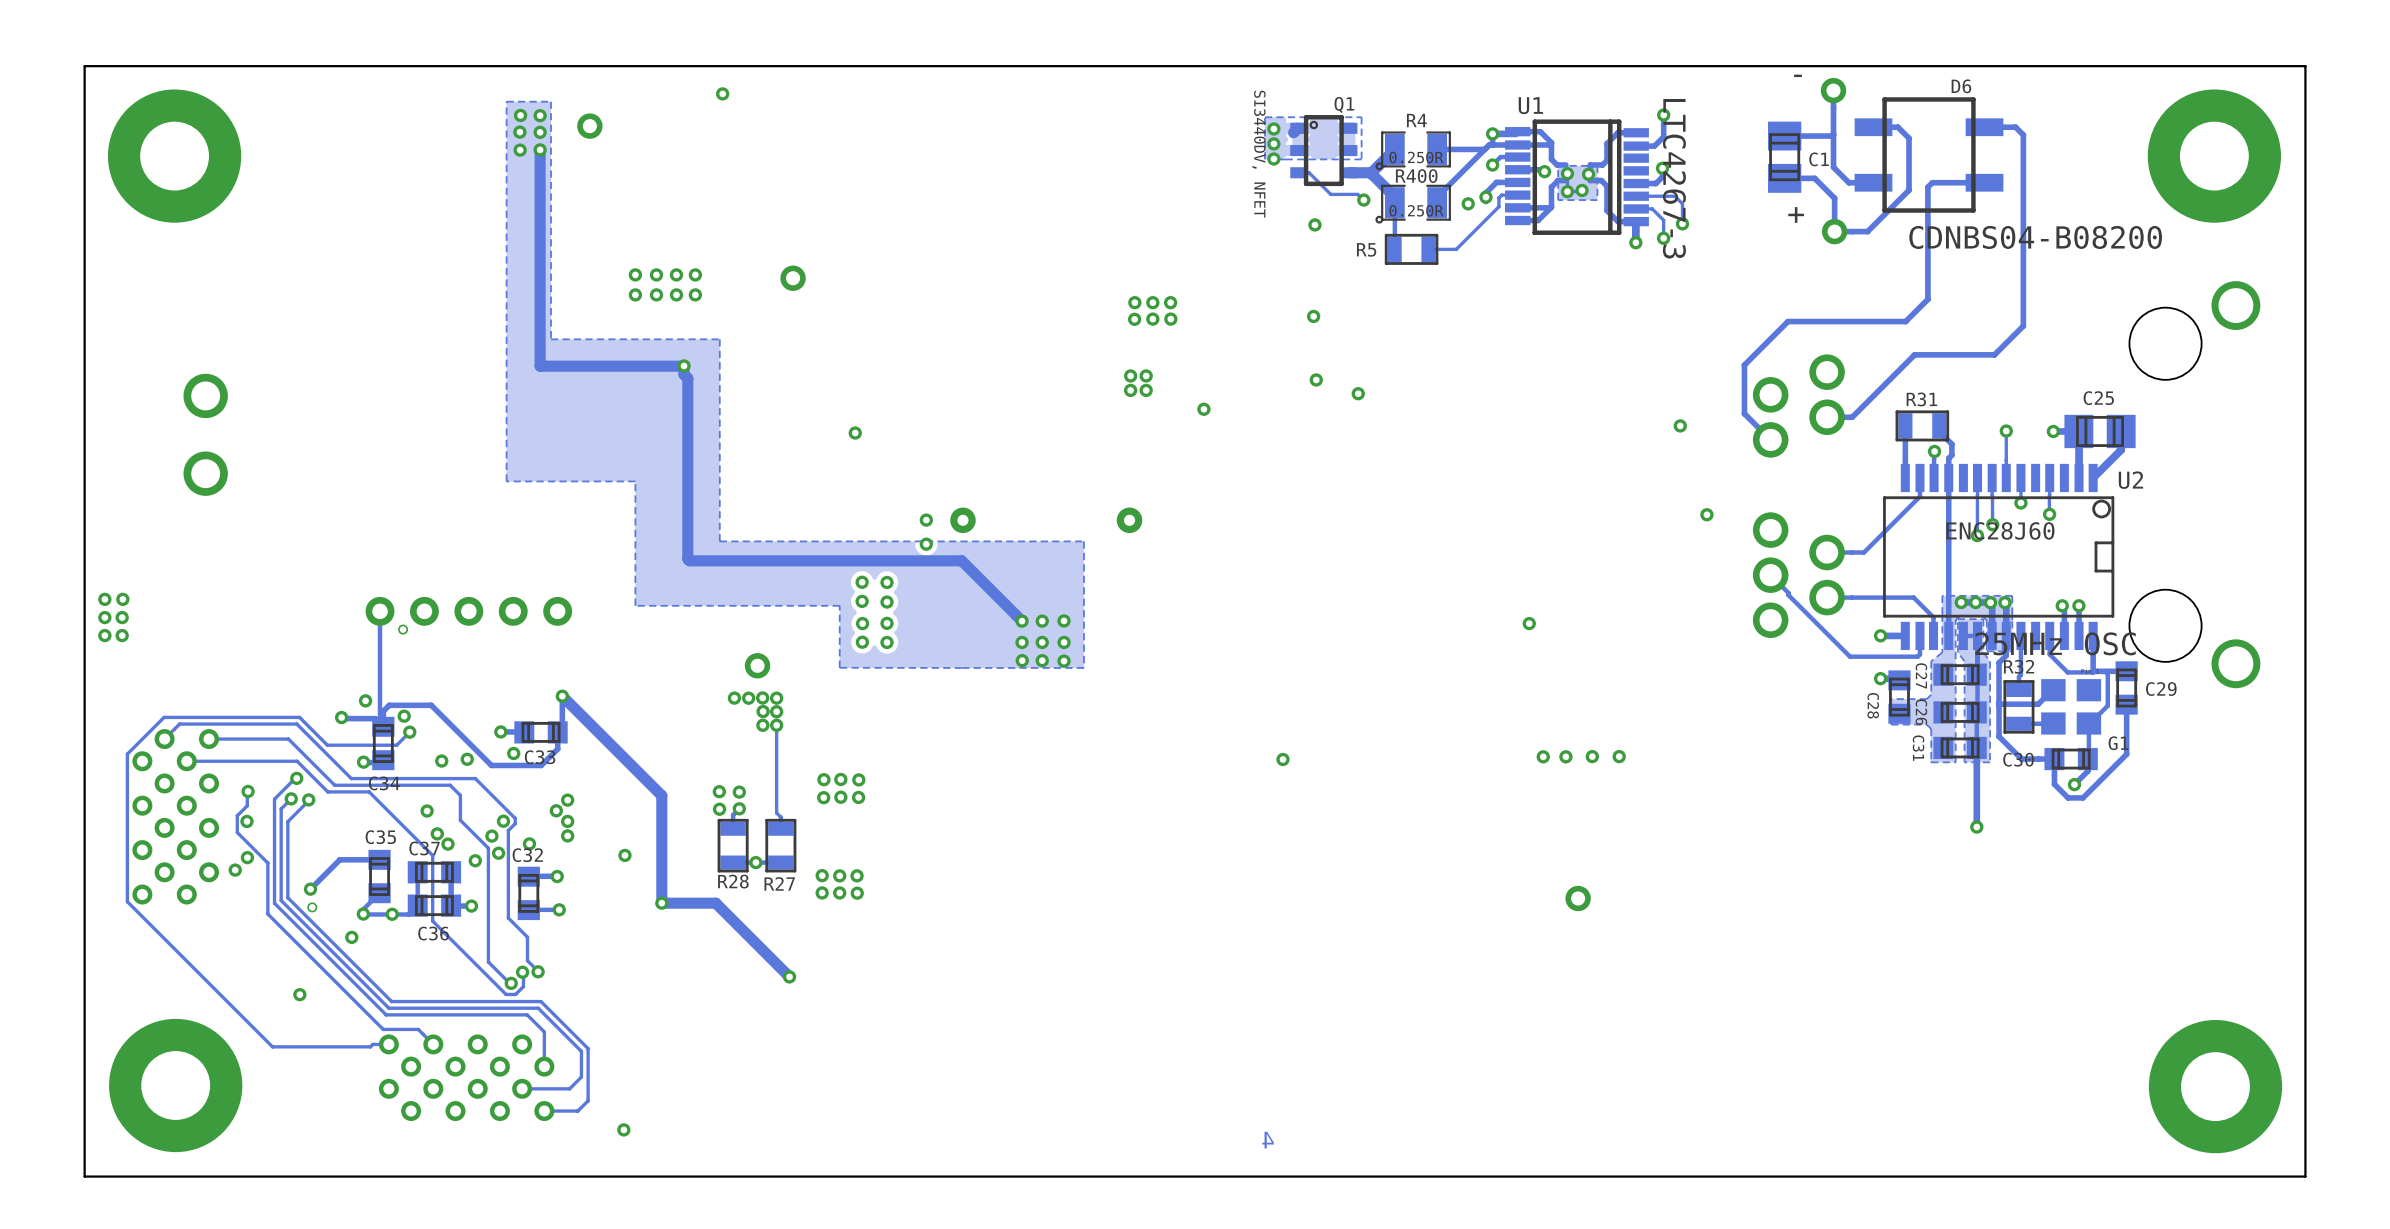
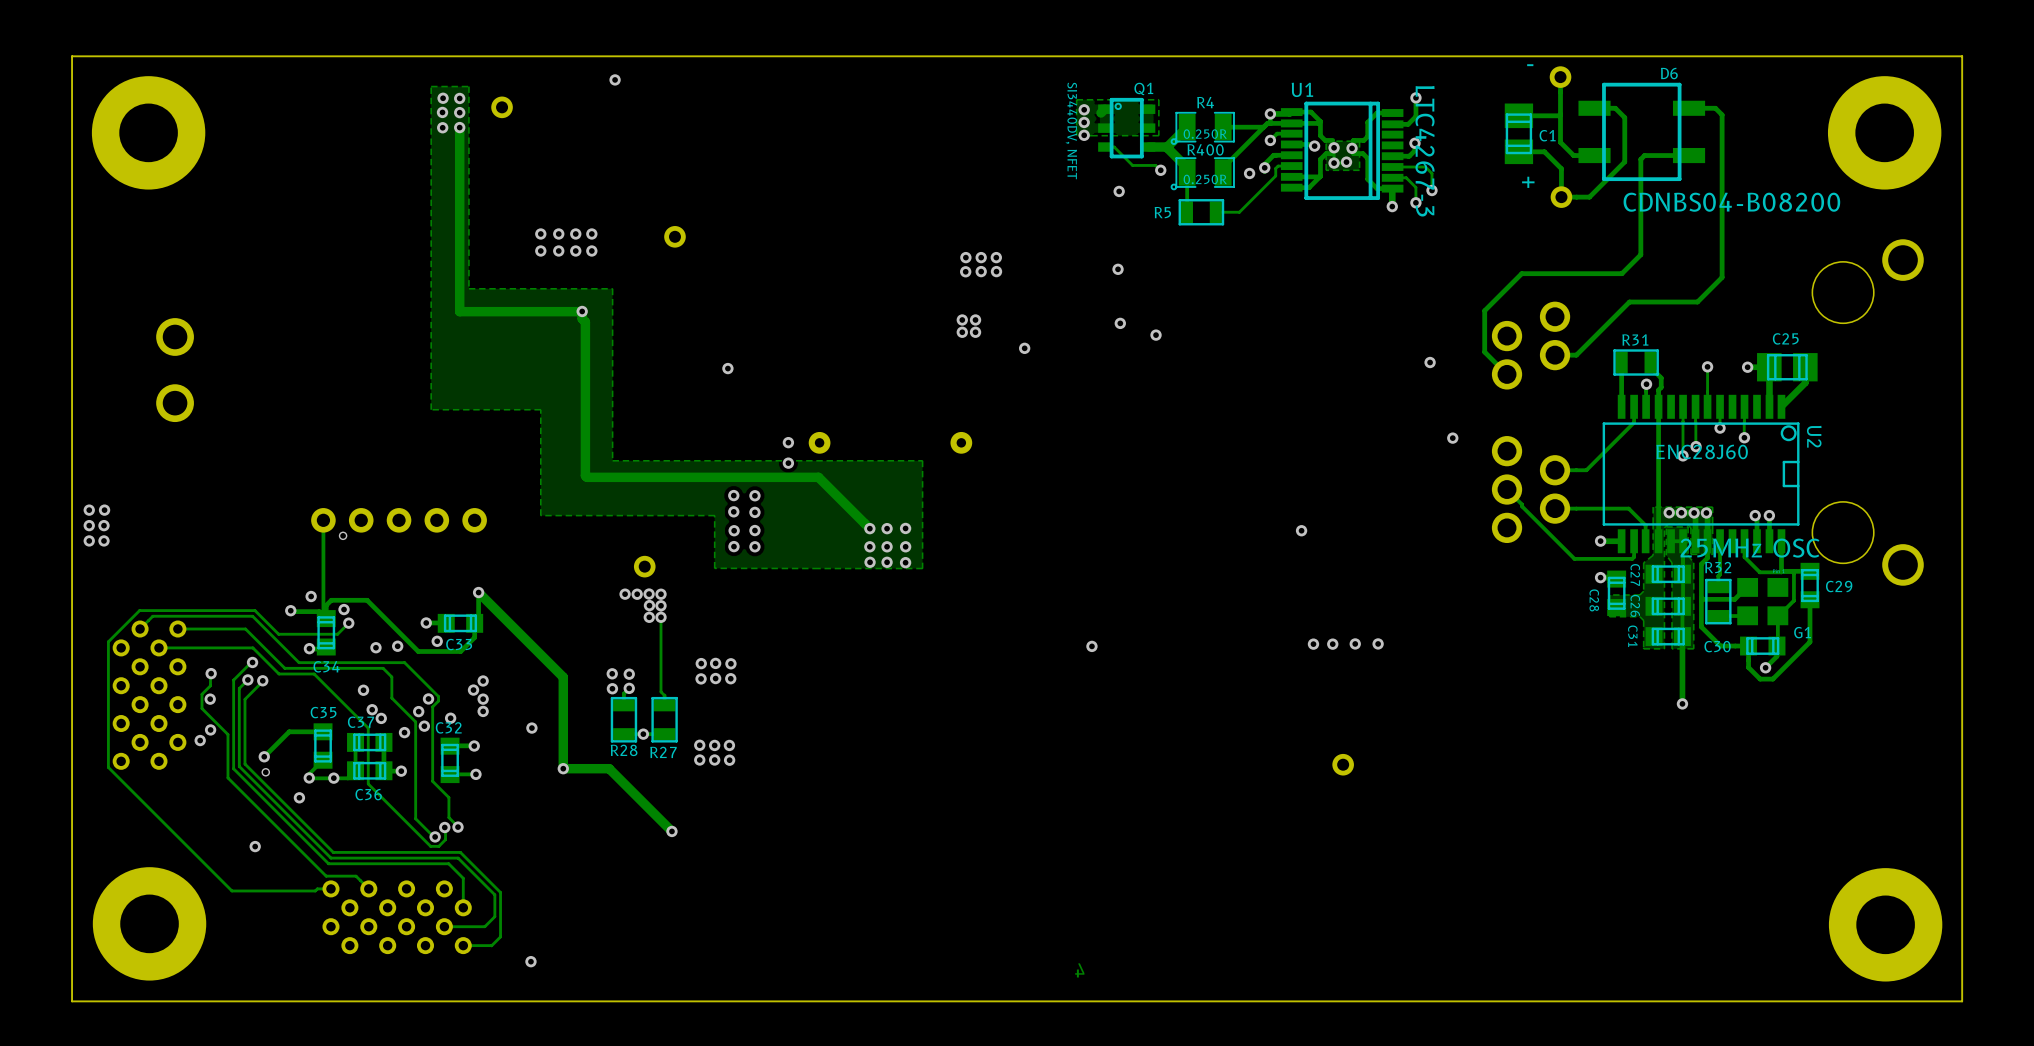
U2 name rotation: 0° (2130, 480) -> 90° clockwise (1814, 436)

